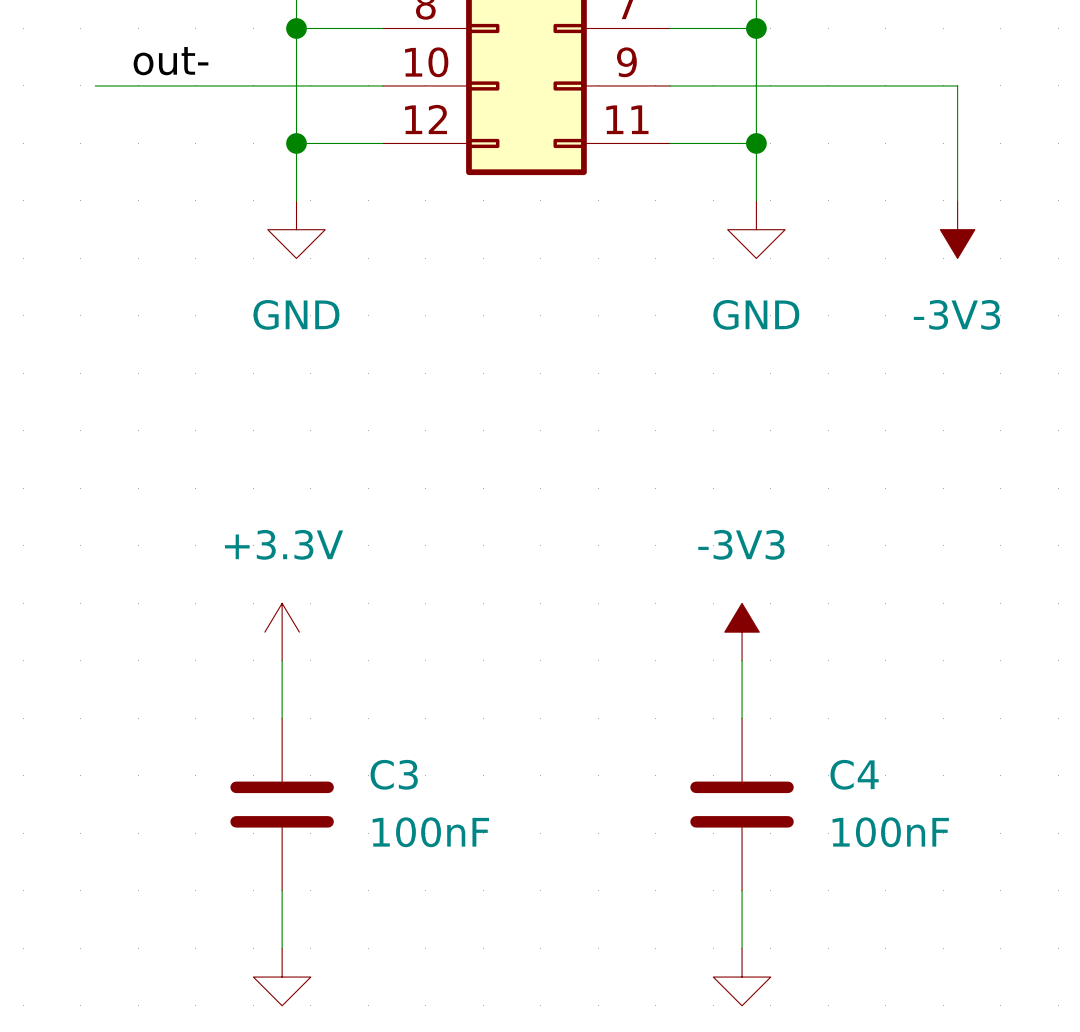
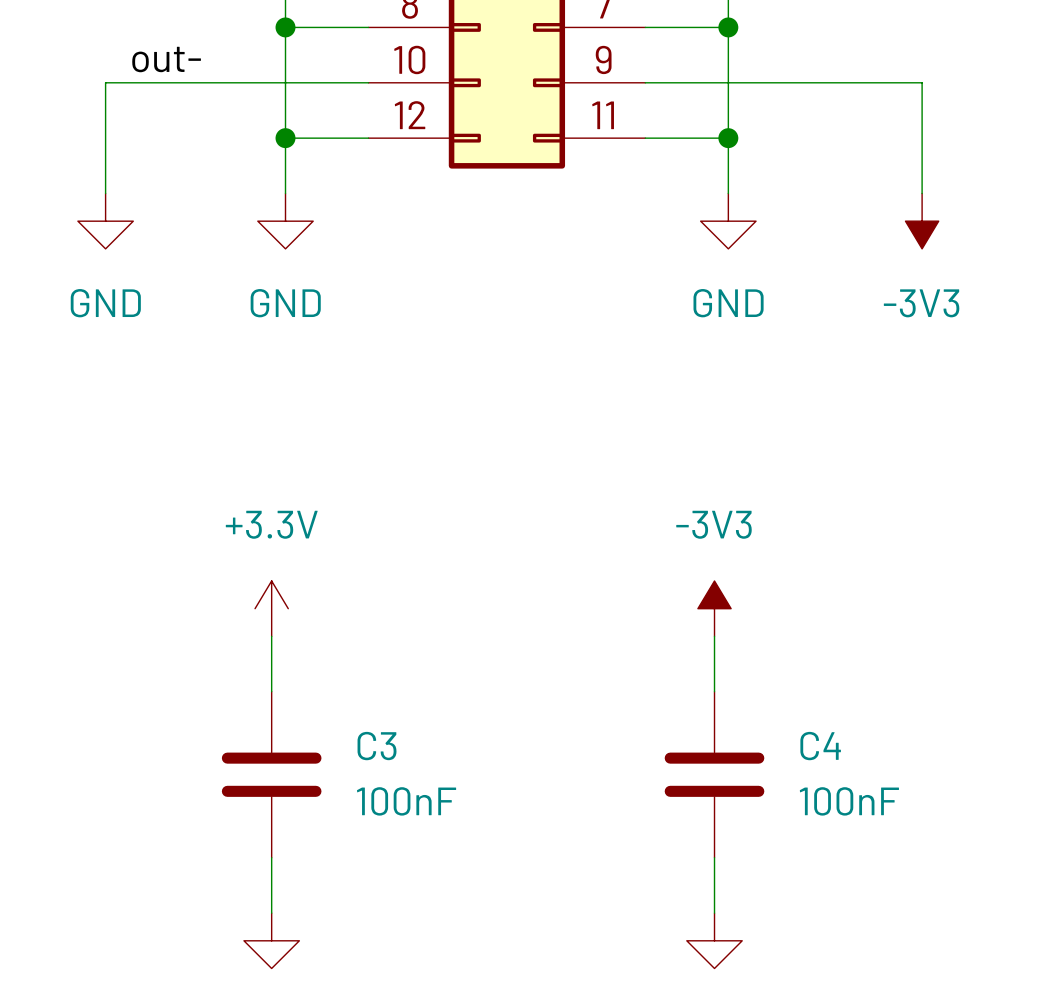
wire: (95, 85) (109, 85) -> (105, 193) (105, 82)
power symbol: none -> GND (105, 221)

